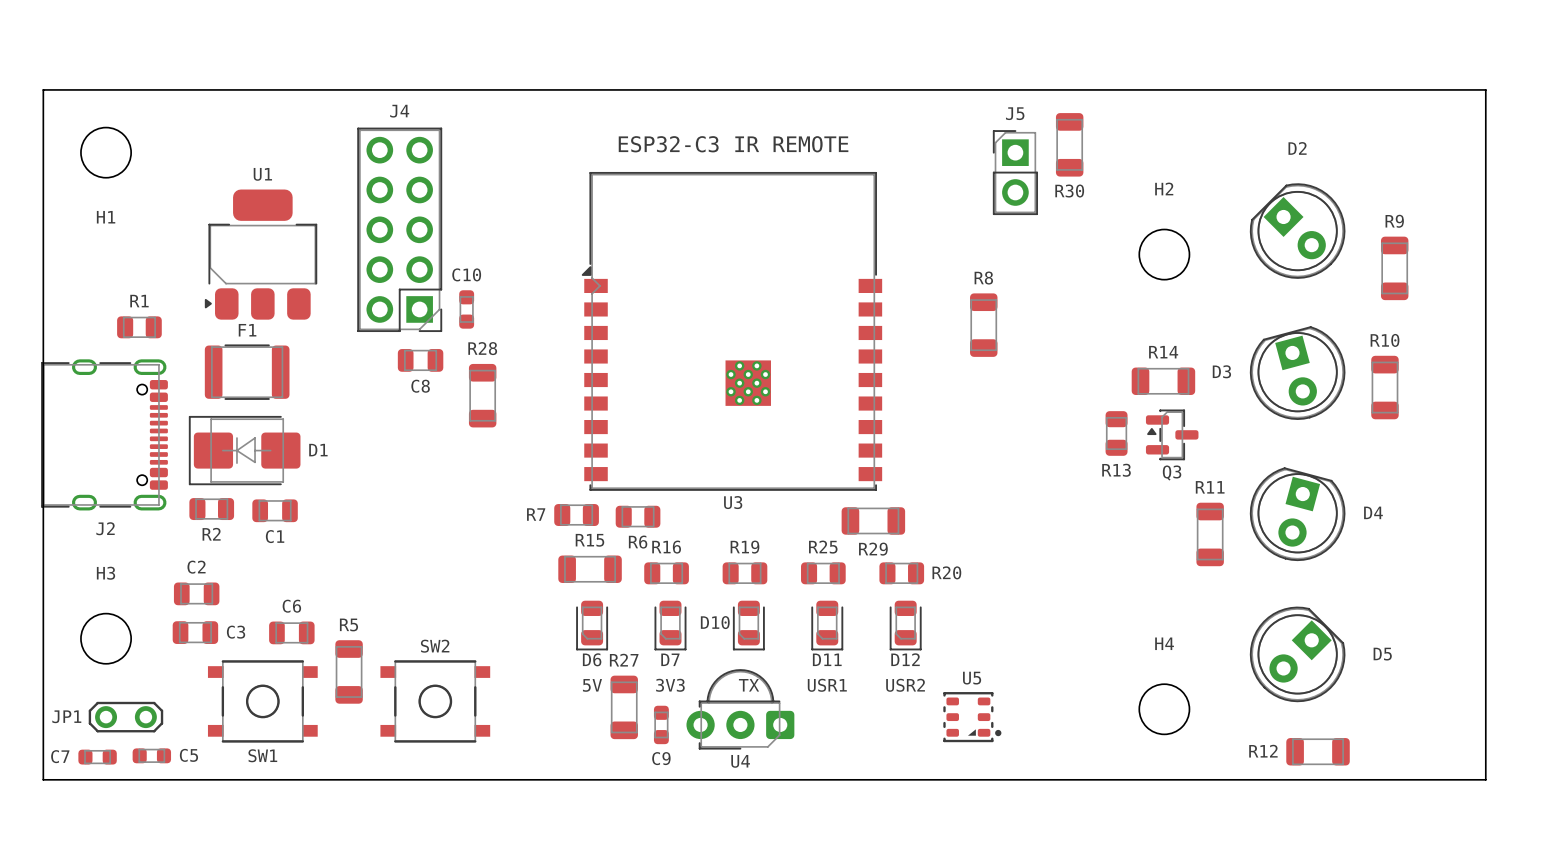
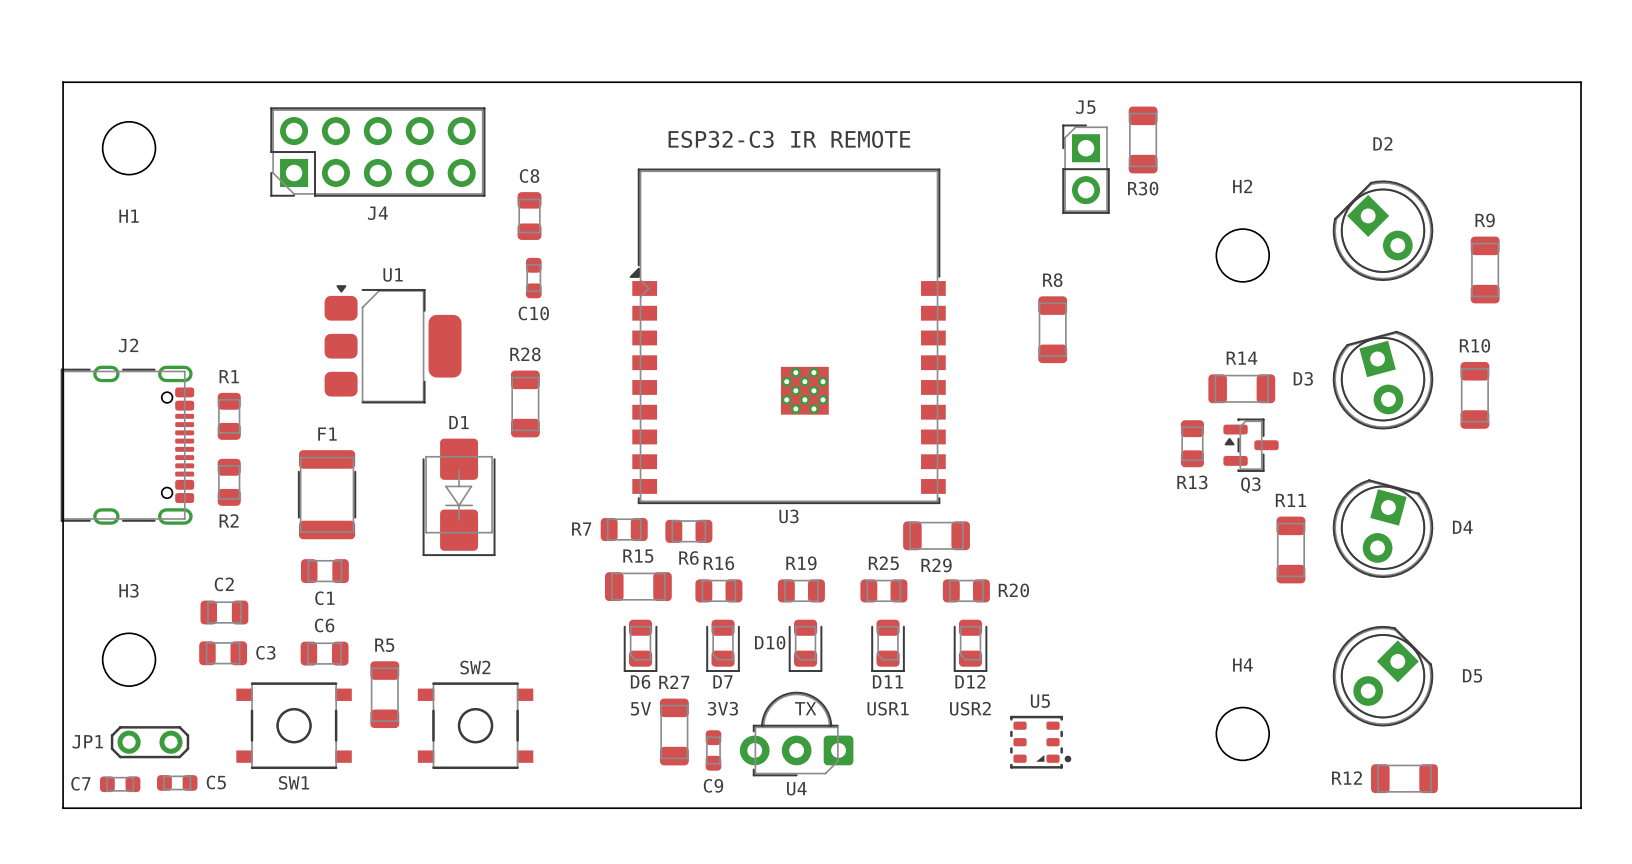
J4 name position: J4 (399, 111) -> J4 (377, 213)
J4 rotation: 0° (399, 229) -> 90° clockwise (377, 152)
U1 rotation: 0° (261, 254) -> 90° clockwise (393, 344)
U1 position: (261, 254) -> (393, 344)
C10 name position: C10 (466, 274) -> C10 (533, 313)
C10 position: (466, 309) -> (533, 278)
R1 rotation: 0° (139, 327) -> 90° clockwise (229, 416)
R1 position: (139, 327) -> (229, 416)
C8 rotation: 0° (420, 360) -> 90° clockwise (529, 216)
C8 position: (420, 360) -> (529, 216)
F1 rotation: 0° (247, 372) -> 90° clockwise (327, 494)
F1 position: (247, 372) -> (327, 494)
C8 name position: C8 (420, 386) -> C8 (529, 176)
D1 rotation: 0° (244, 450) -> 90° counterclockwise (459, 497)
D1 position: (244, 450) -> (459, 497)
R2 rotation: 0° (211, 509) -> 90° clockwise (229, 482)
R2 position: (211, 509) -> (229, 482)
C1 position: (275, 510) -> (324, 571)
J2 name position: J2 (105, 528) -> J2 (128, 345)

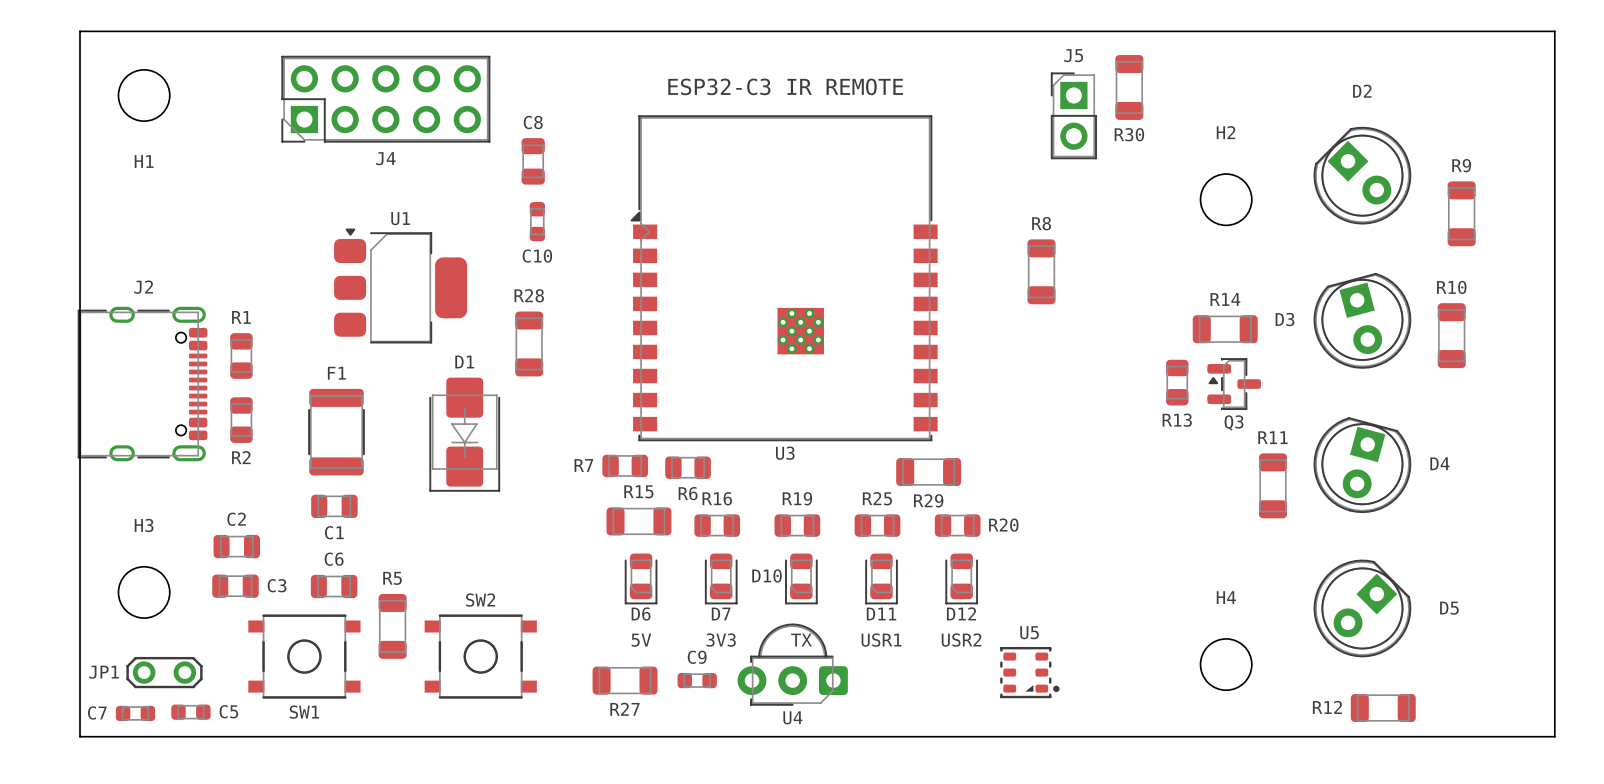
R27 name position: R27 (674, 682) -> R27 (624, 709)
R27 rotation: 0° (674, 731) -> 90° clockwise (625, 680)
R27 position: (674, 731) -> (625, 680)
C9 rotation: 0° (713, 750) -> 90° clockwise (697, 680)
C9 name position: C9 (713, 785) -> C9 (697, 657)

